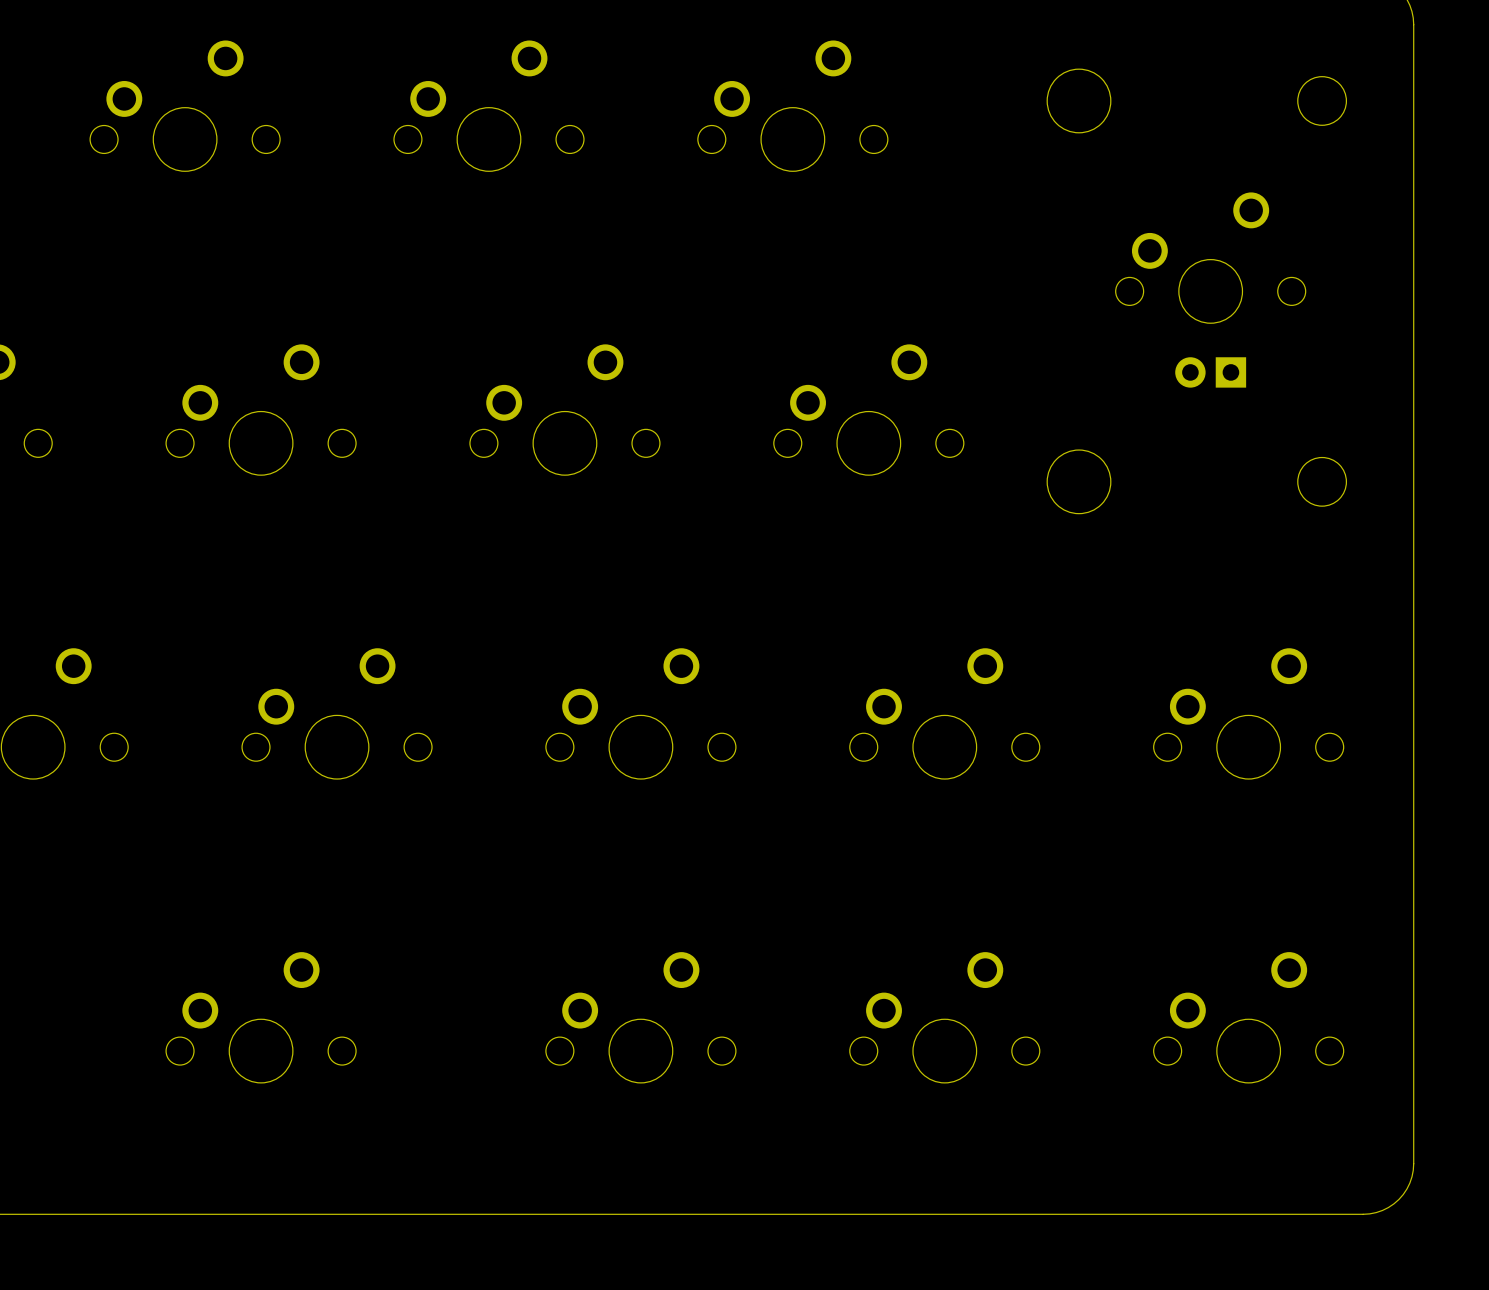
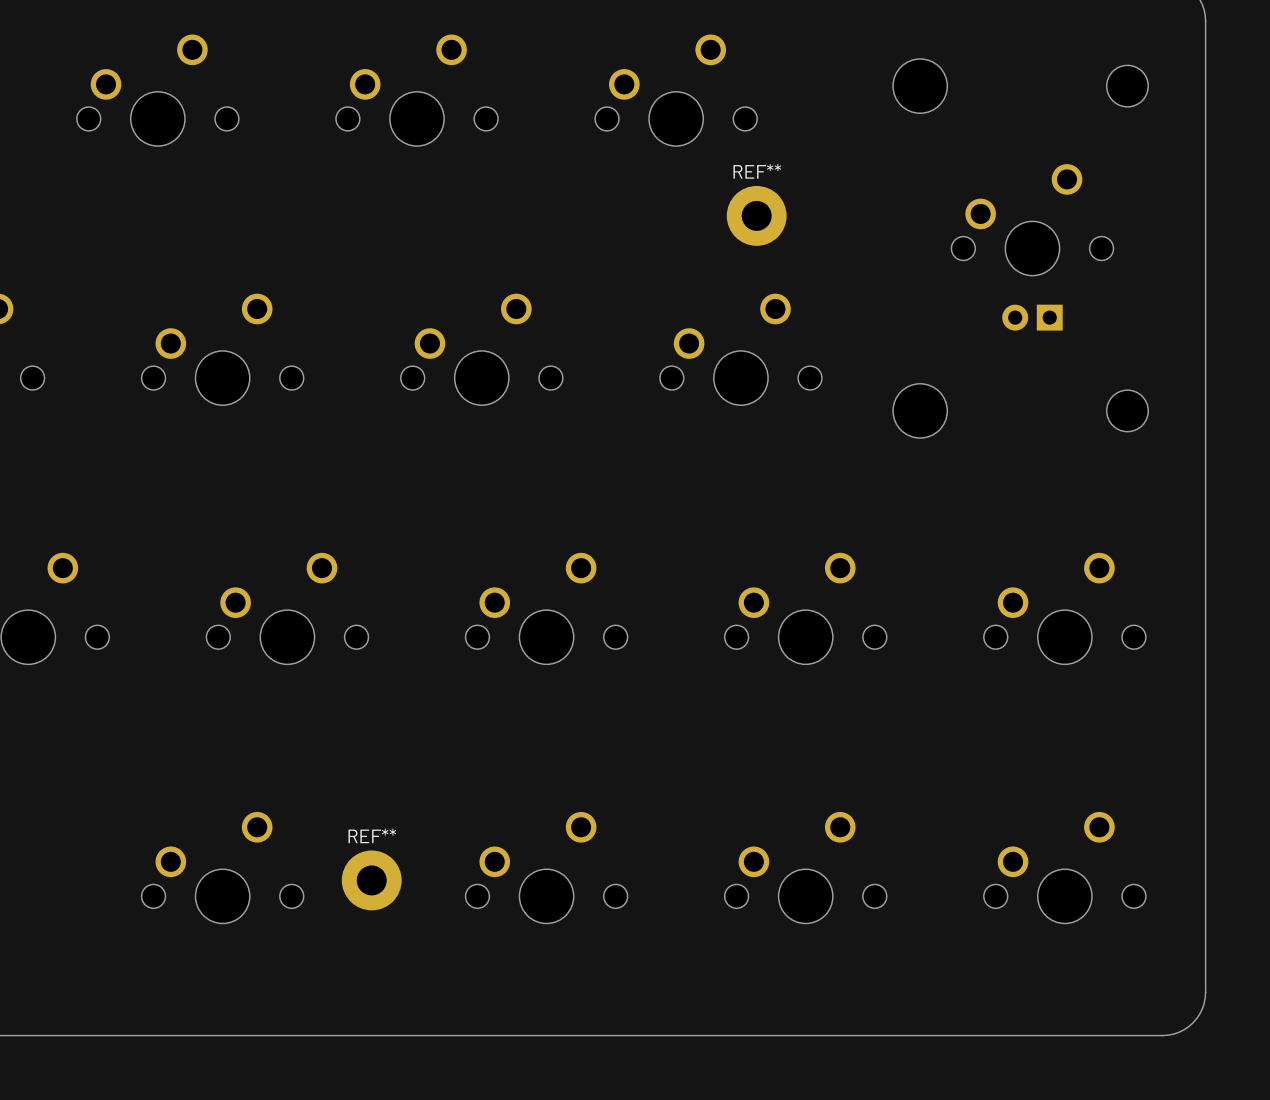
REF**: none -> (756, 215)
REF**: none -> (371, 880)

